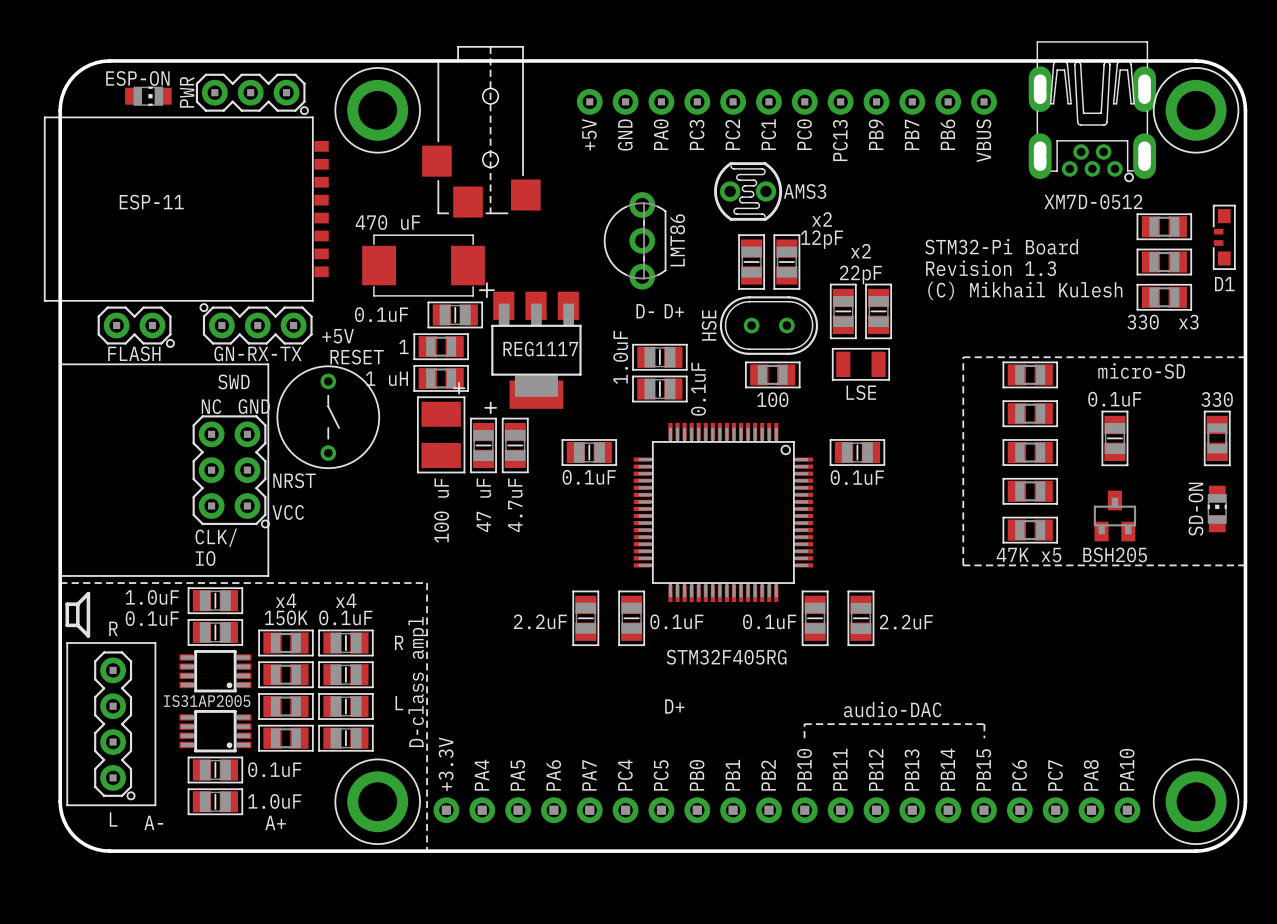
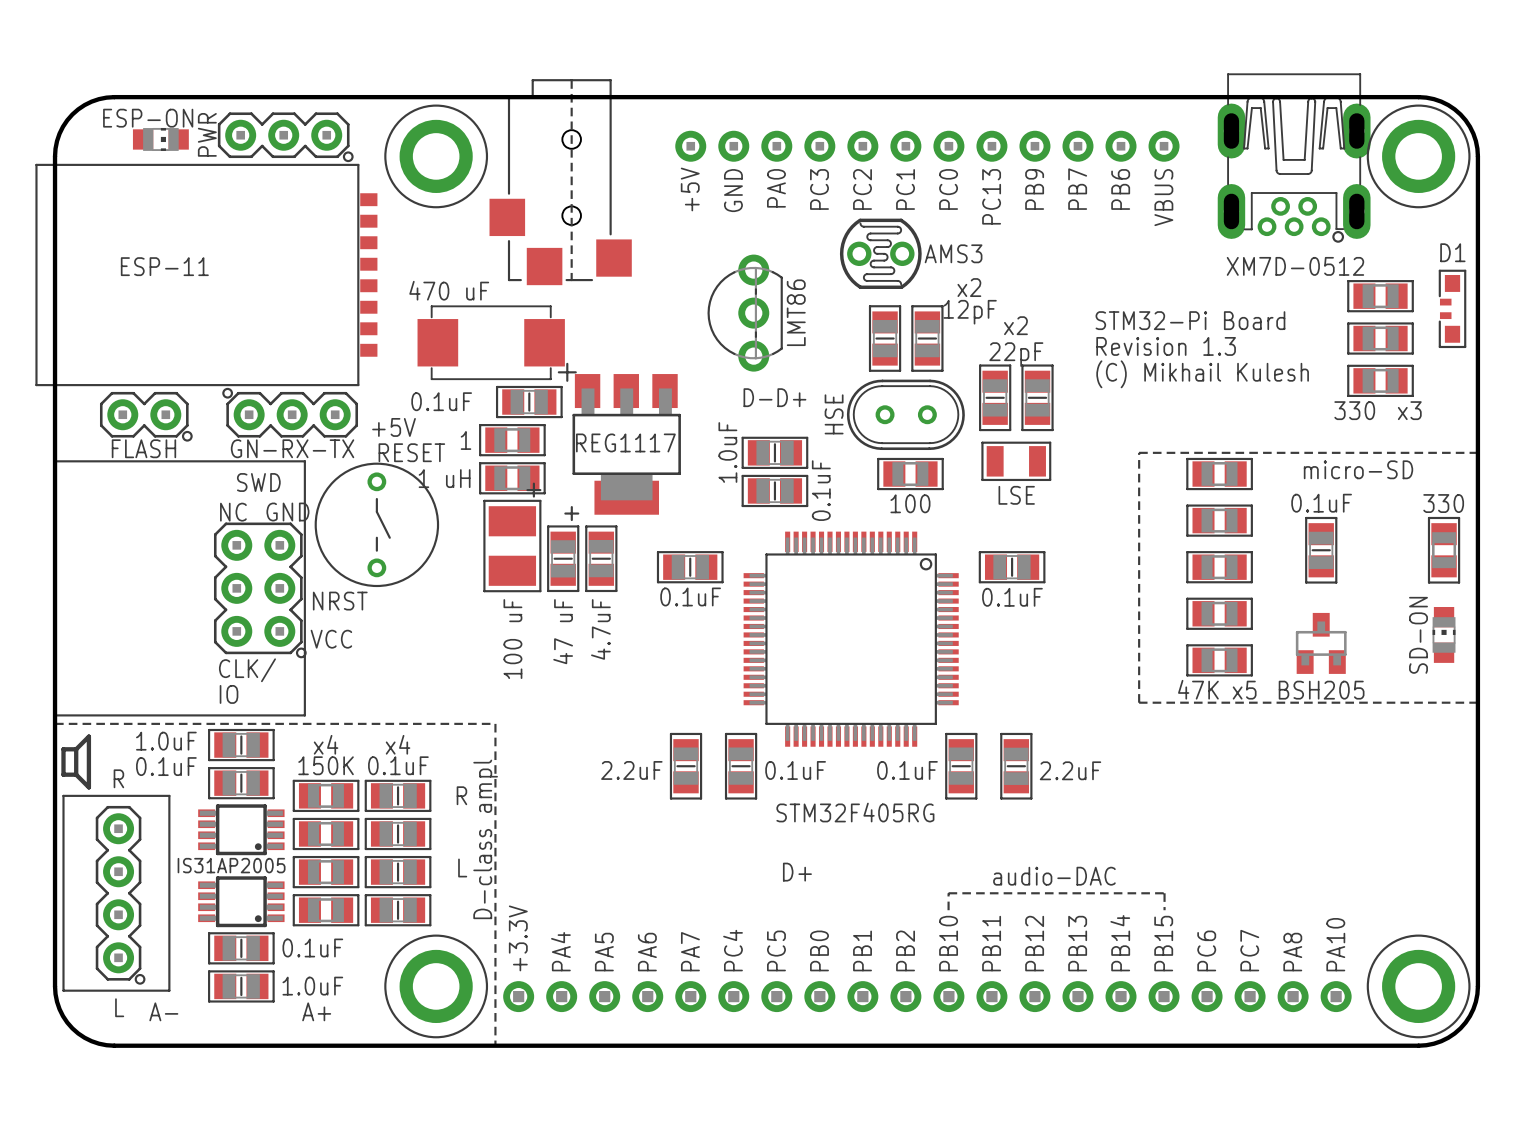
D1 name position: D1 (1224, 284) -> D1 (1452, 252)

